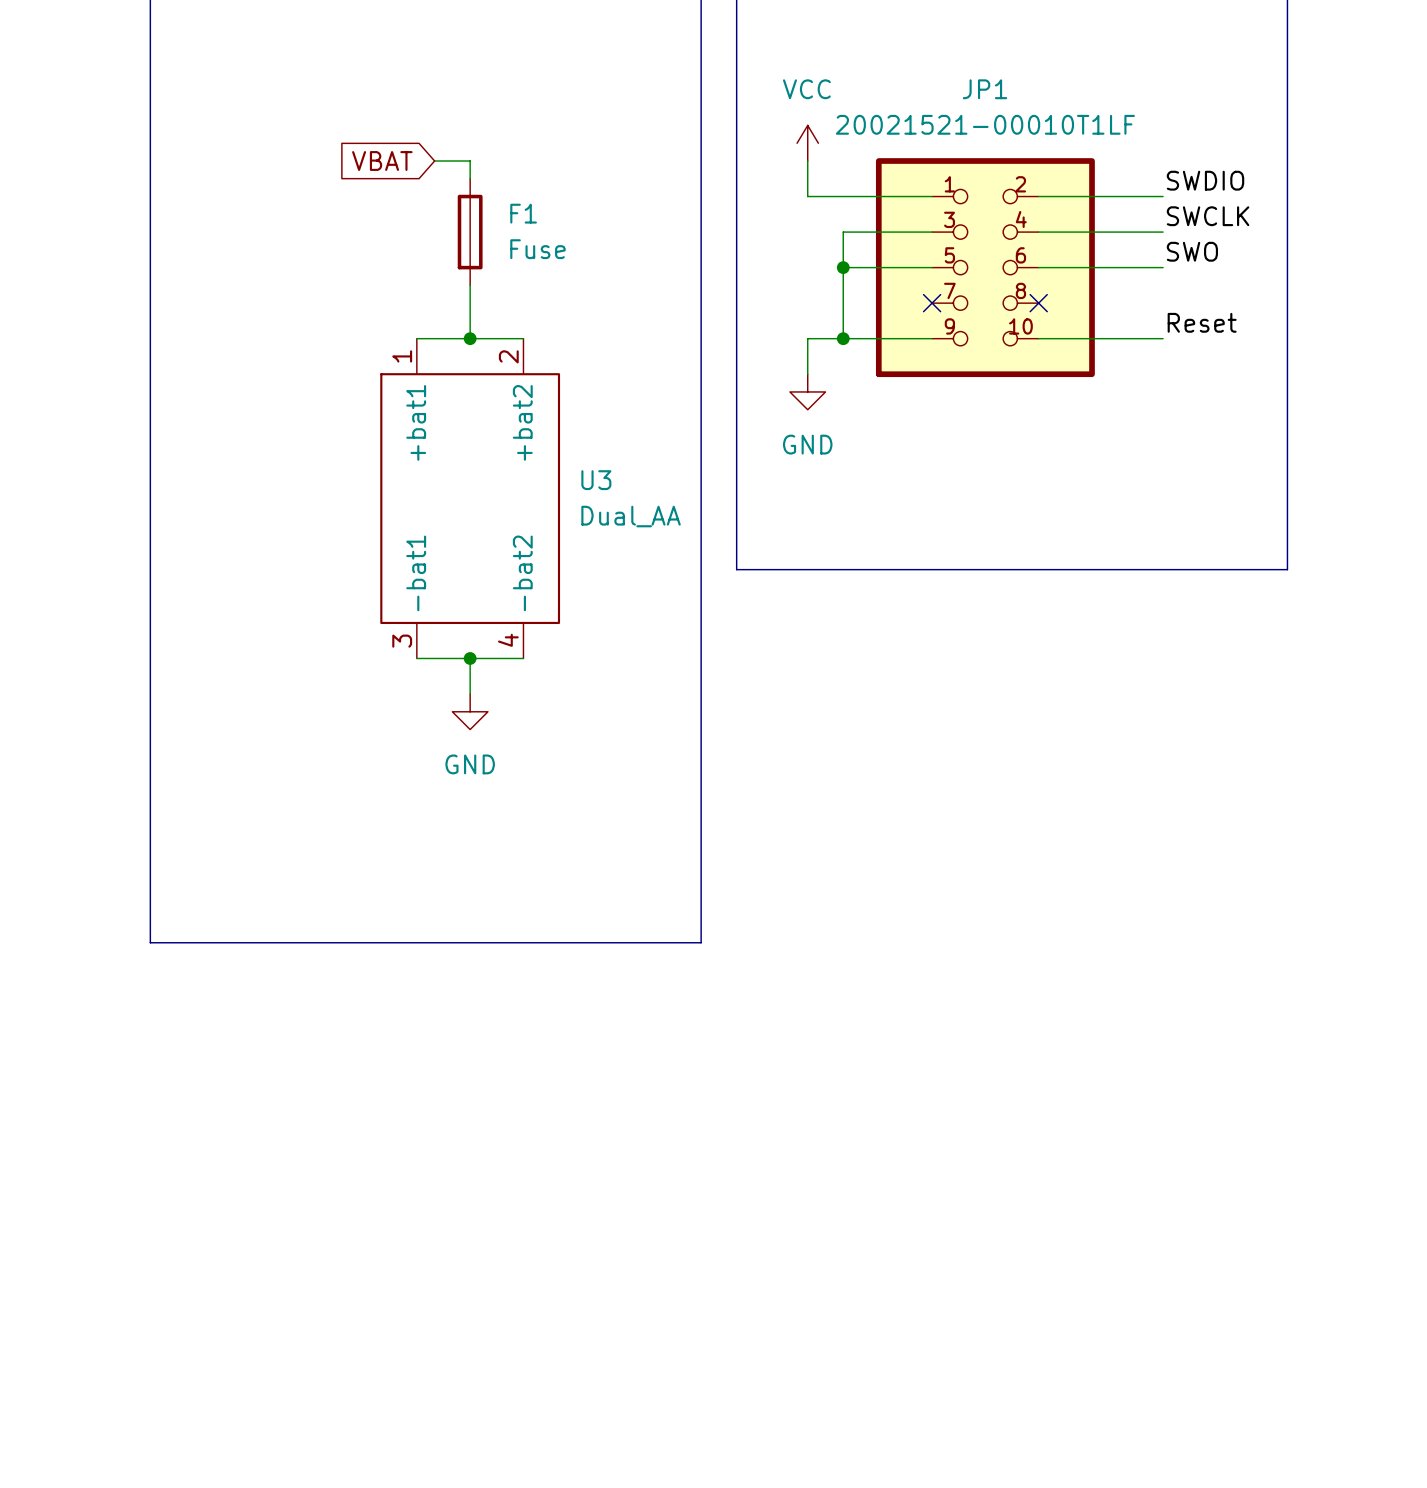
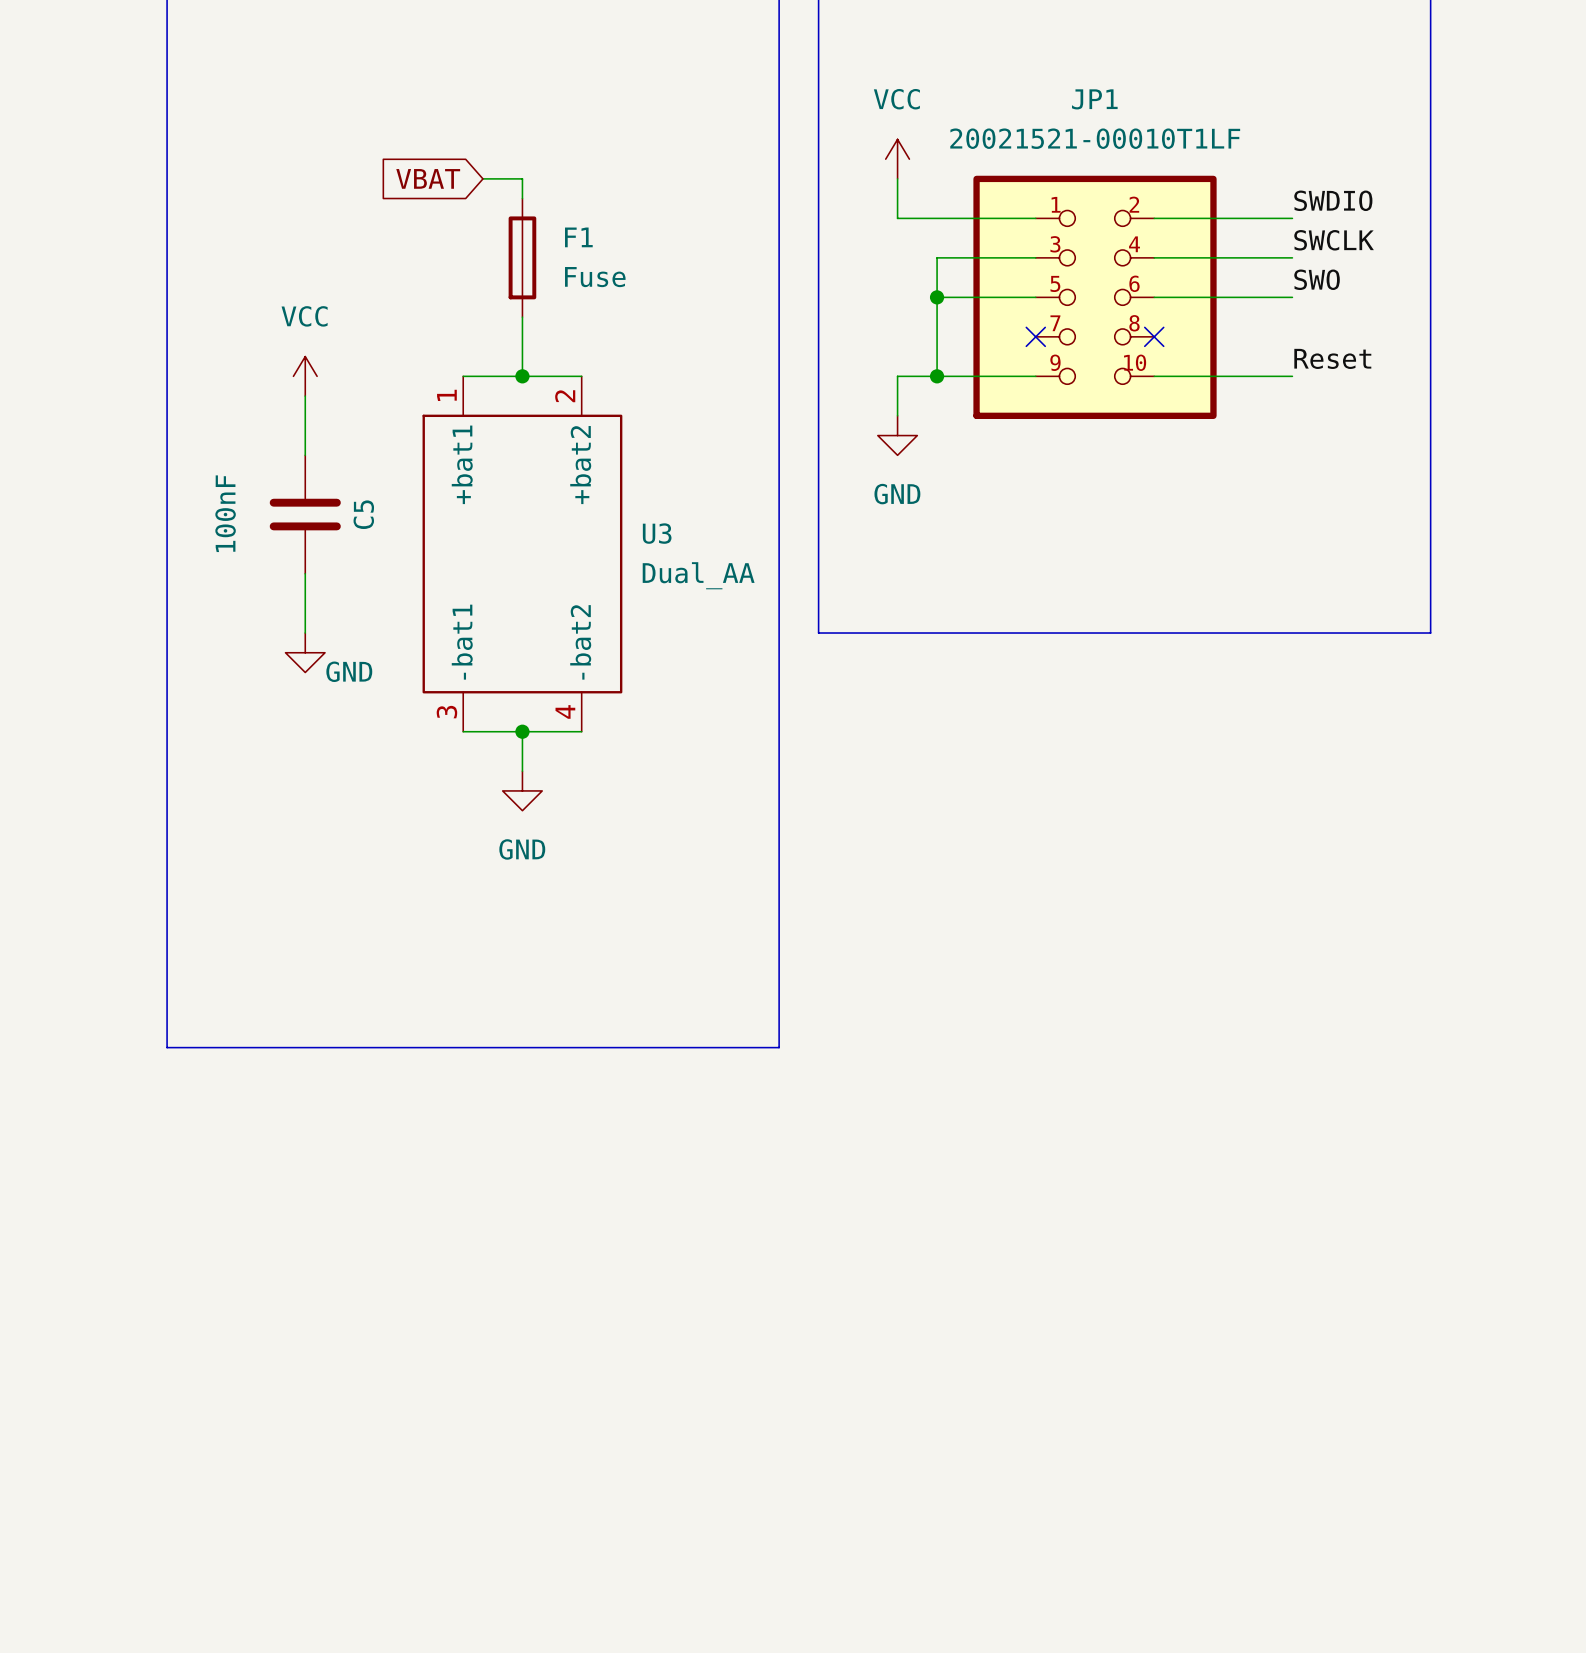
power symbol: none -> VCC (305, 376)
wire: none -> (305, 396) (305, 455)
C5: none -> 100nF (305, 514)
wire: none -> (305, 573) (305, 633)
power symbol: none -> GND (305, 652)

